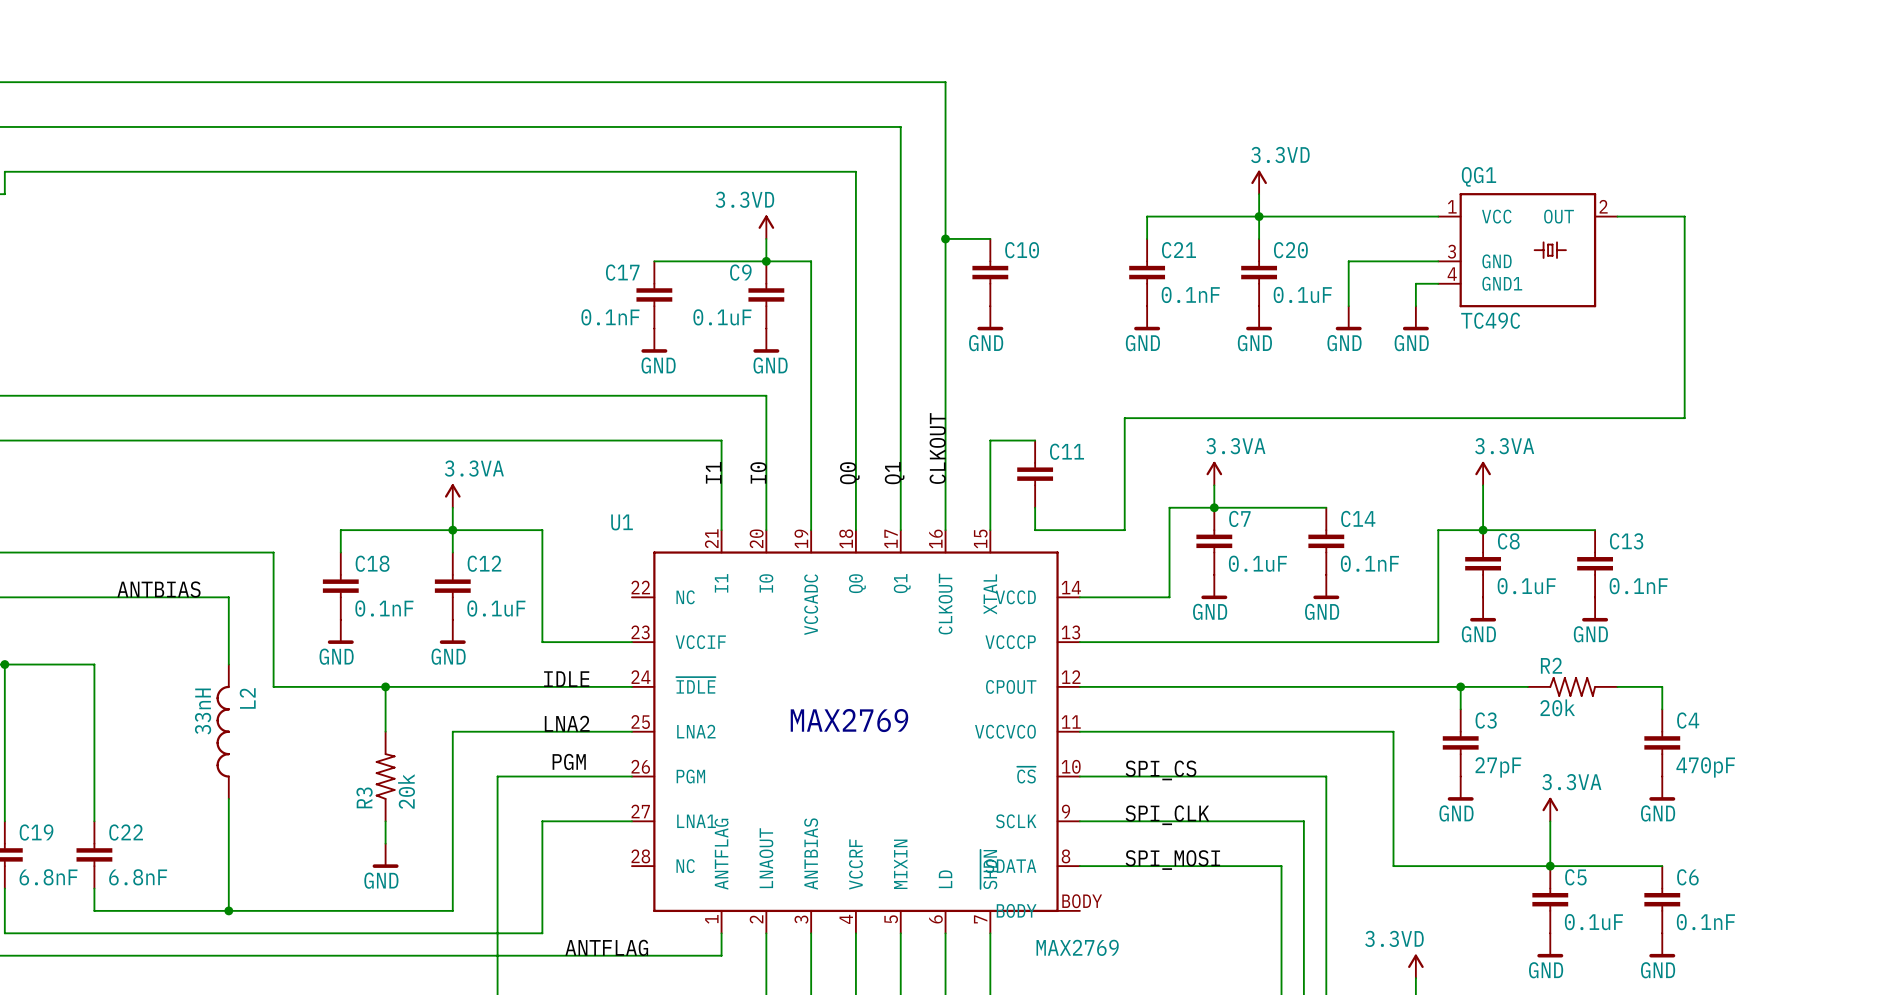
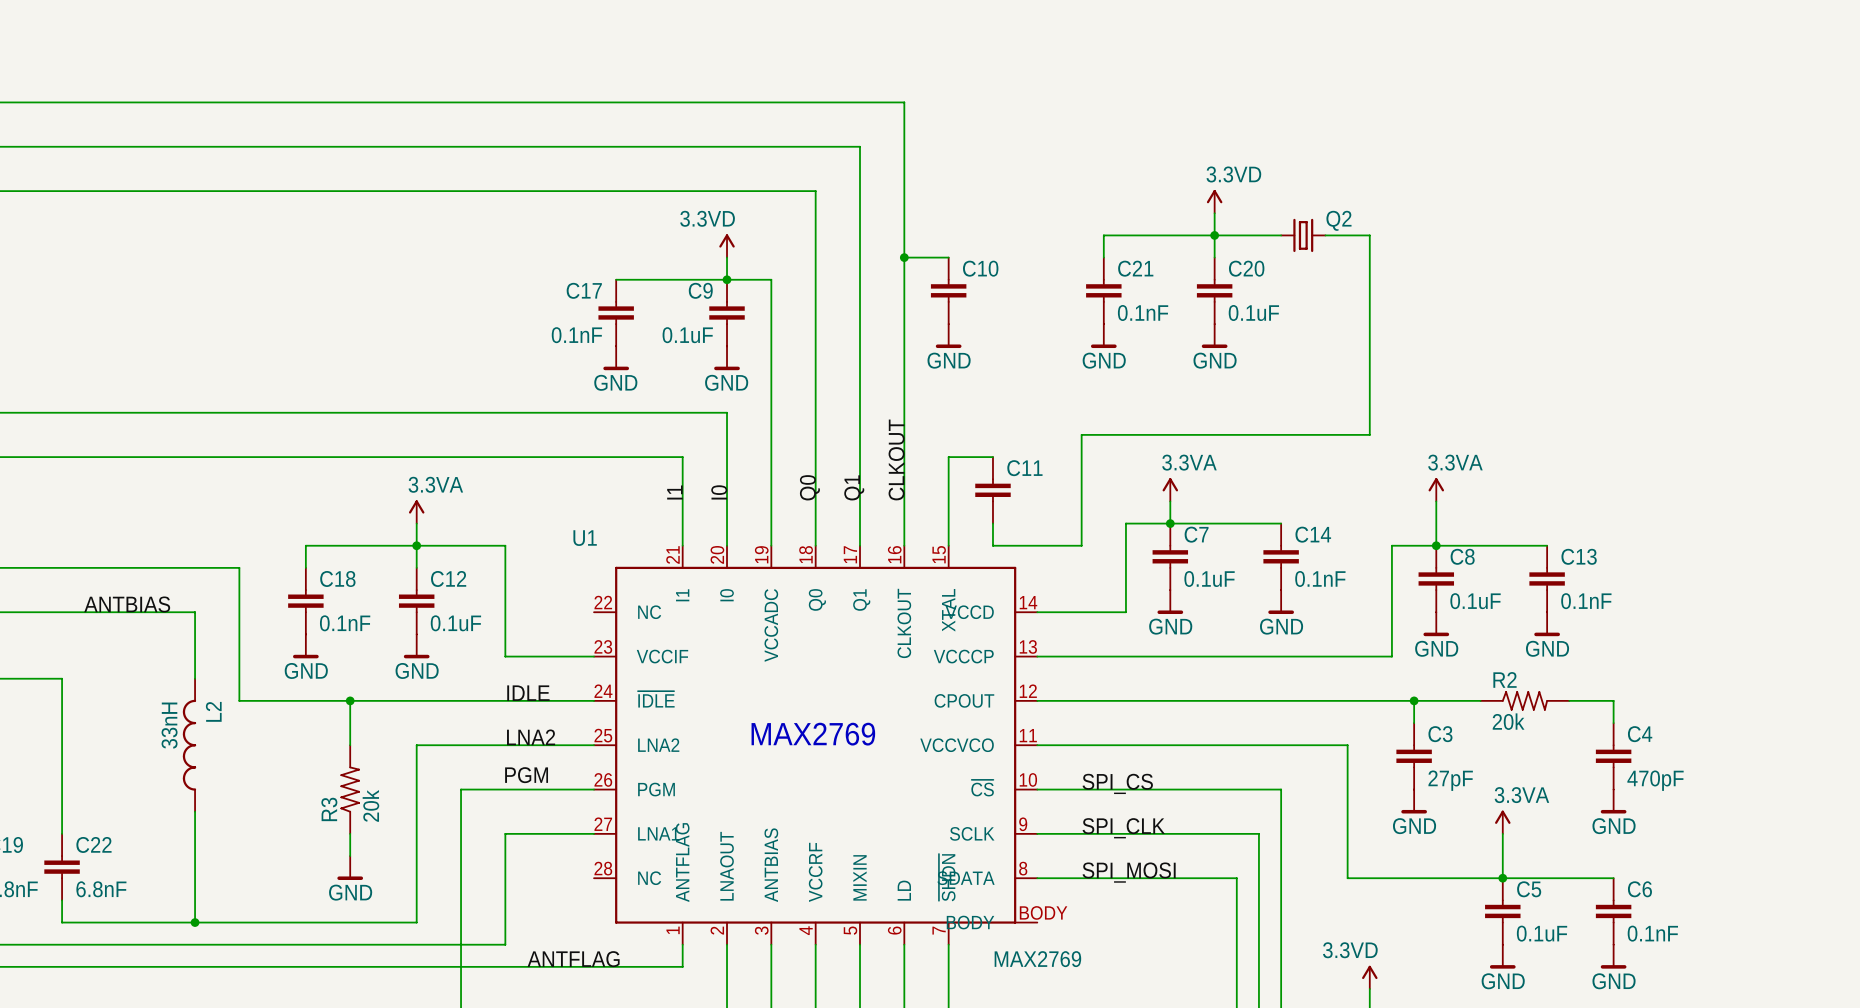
Q2: none -> (1303, 235)
wire: (1415, 216) (1438, 216) -> (1369, 235) (1369, 301)
wire: (1617, 216) (1684, 216) (1684, 418) (1415, 418) -> (1369, 324) (1369, 434)
QG1: TC49C (1527, 250) -> none
wire: (1438, 261) (1348, 261) (1348, 306) -> none
wire: (1415, 283) (1438, 283) -> none
power symbol: GND (1348, 318) -> none
power symbol: GND (1415, 318) -> none

